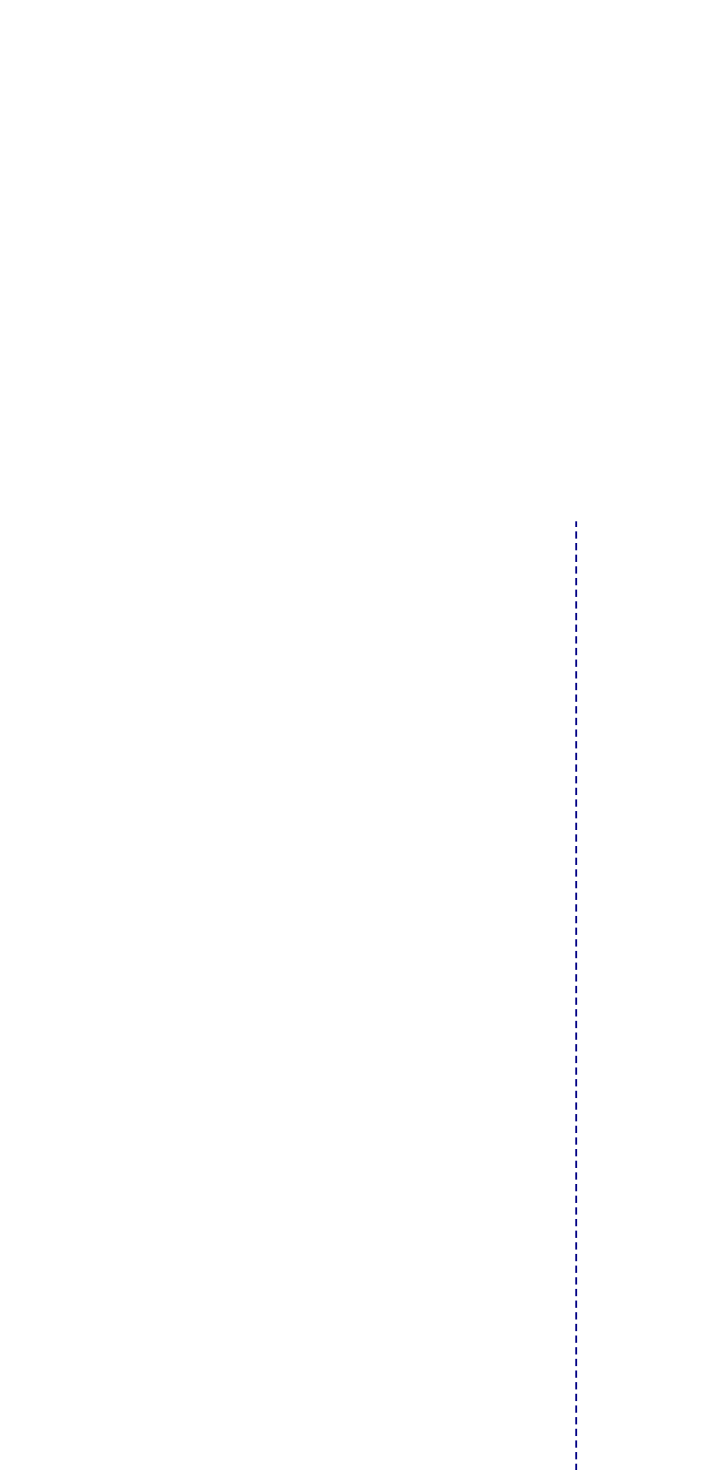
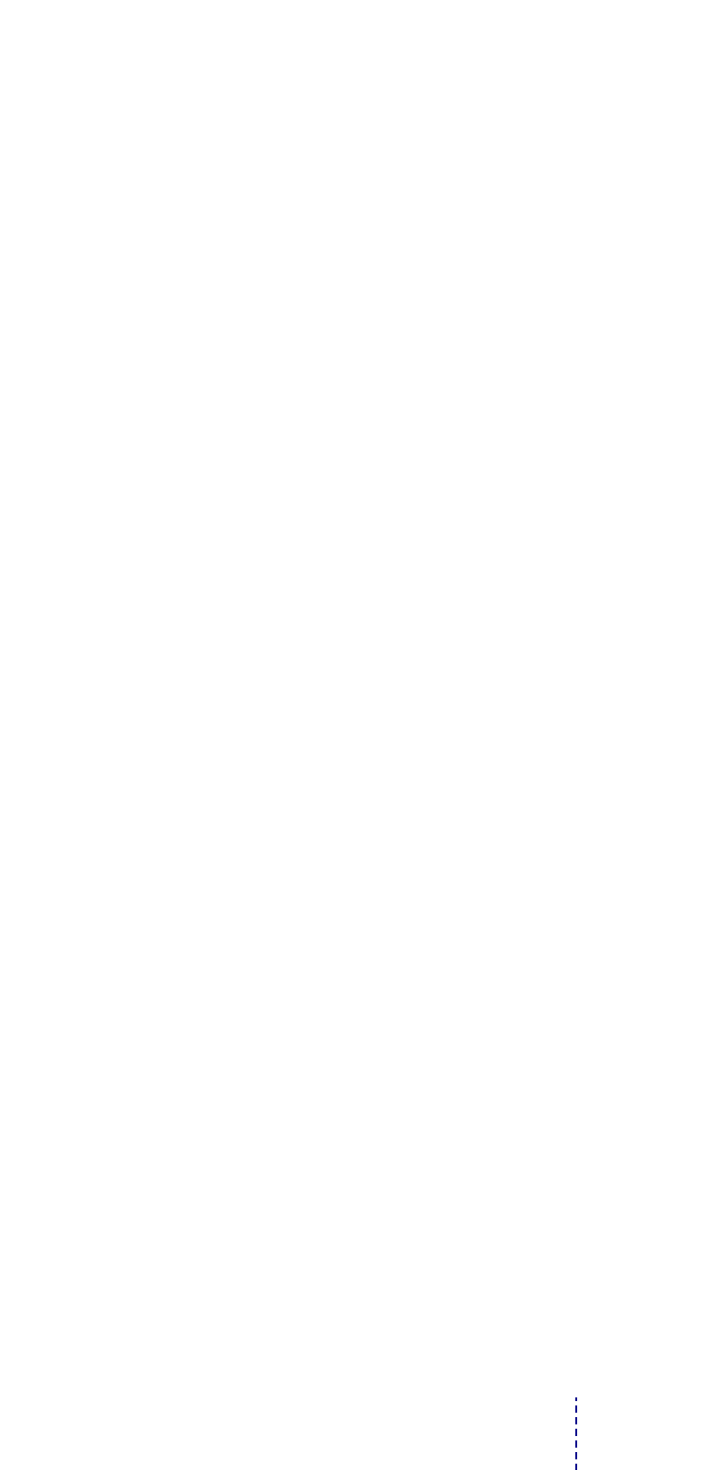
line: (576, 521) (576, 1397) -> none

